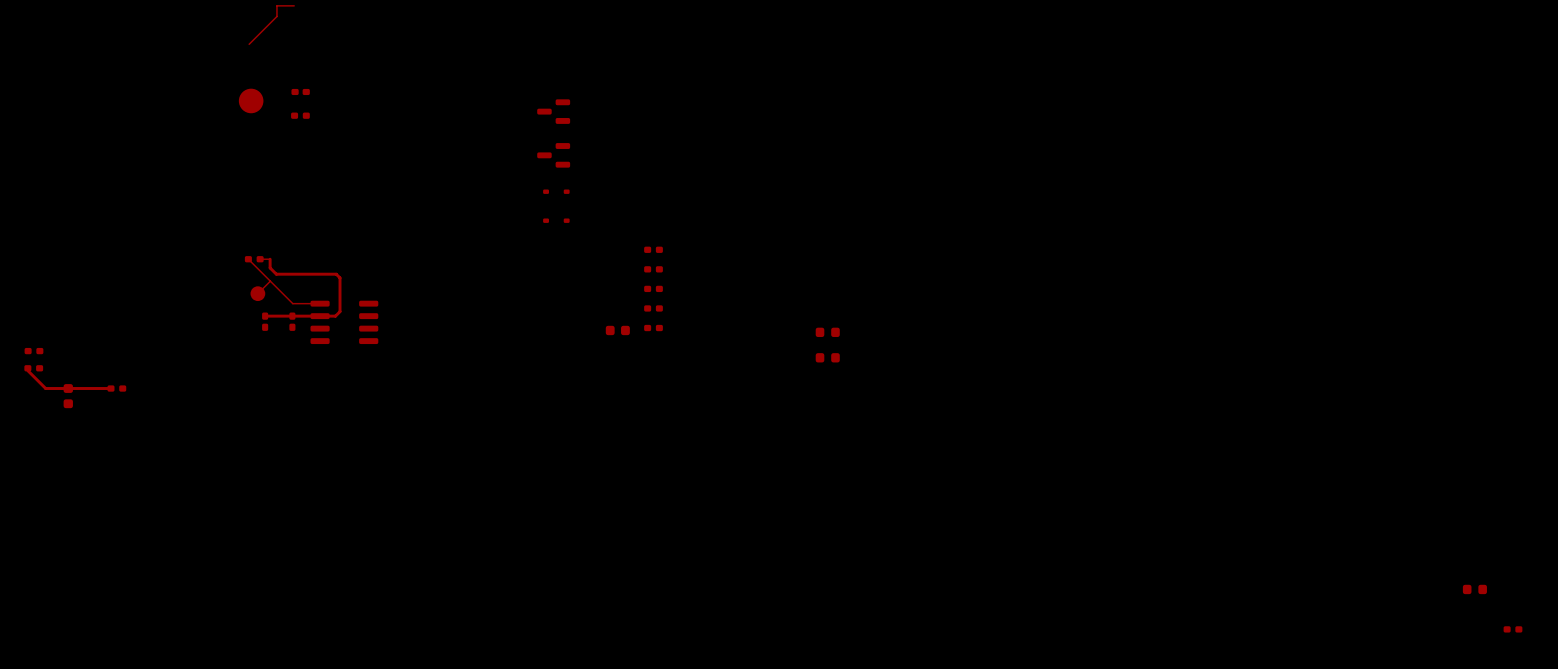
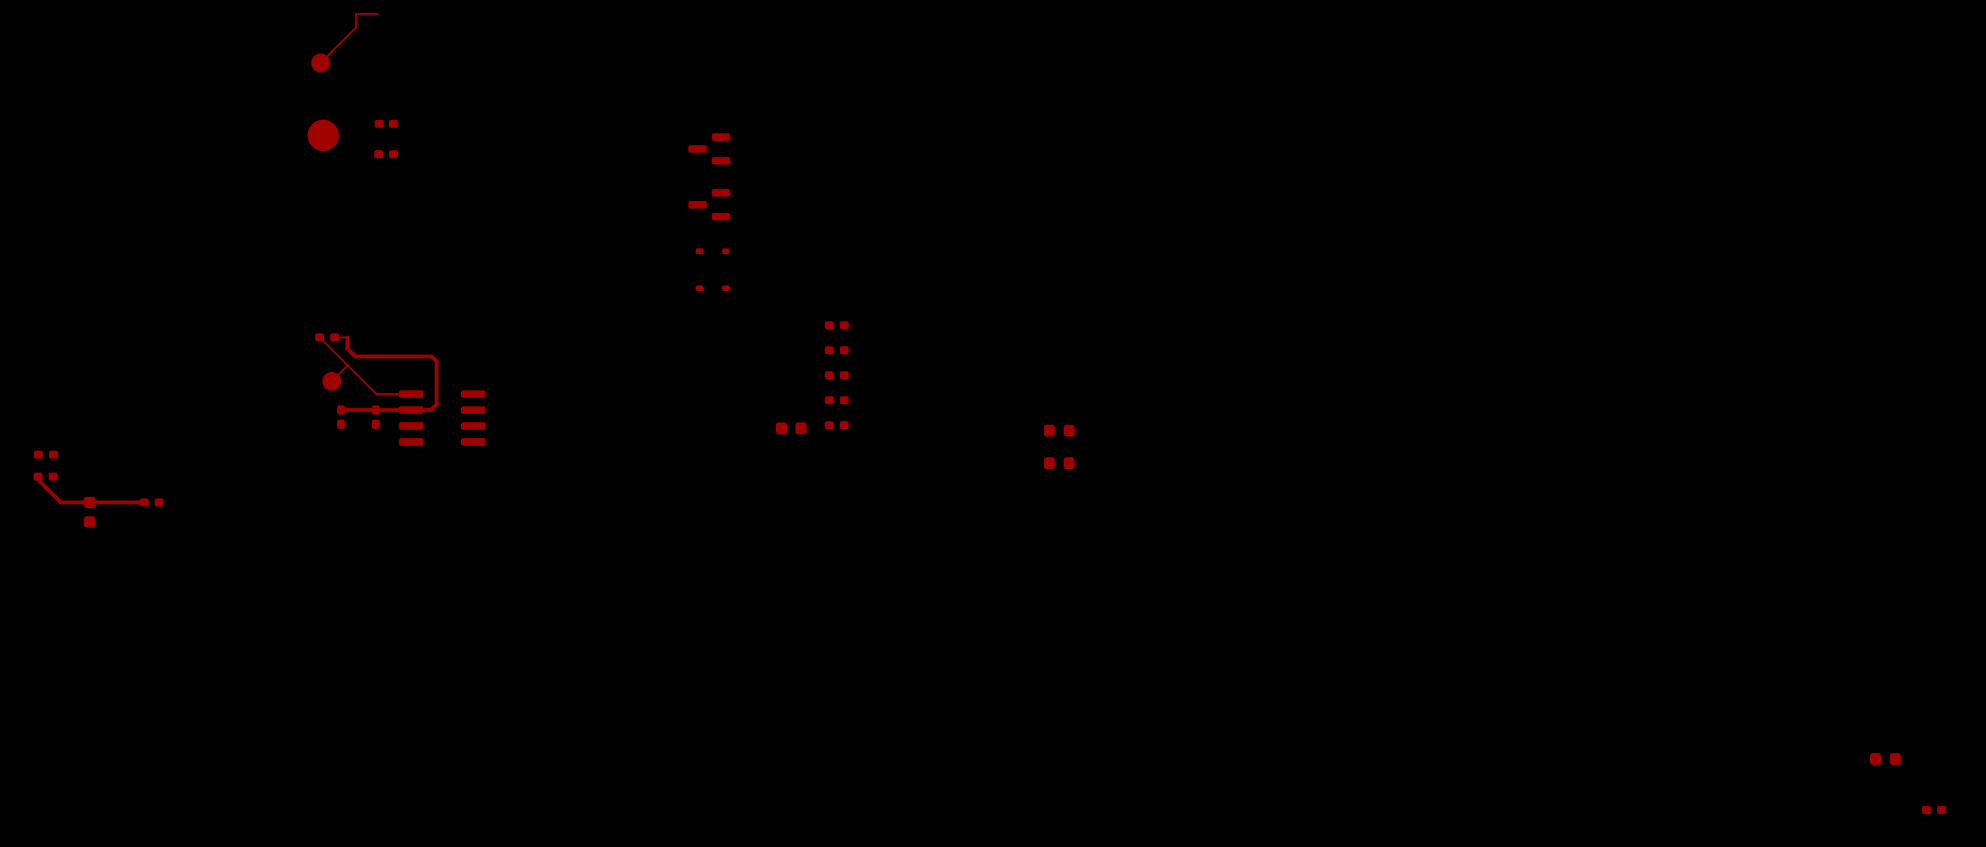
part: none -> (320, 63)

